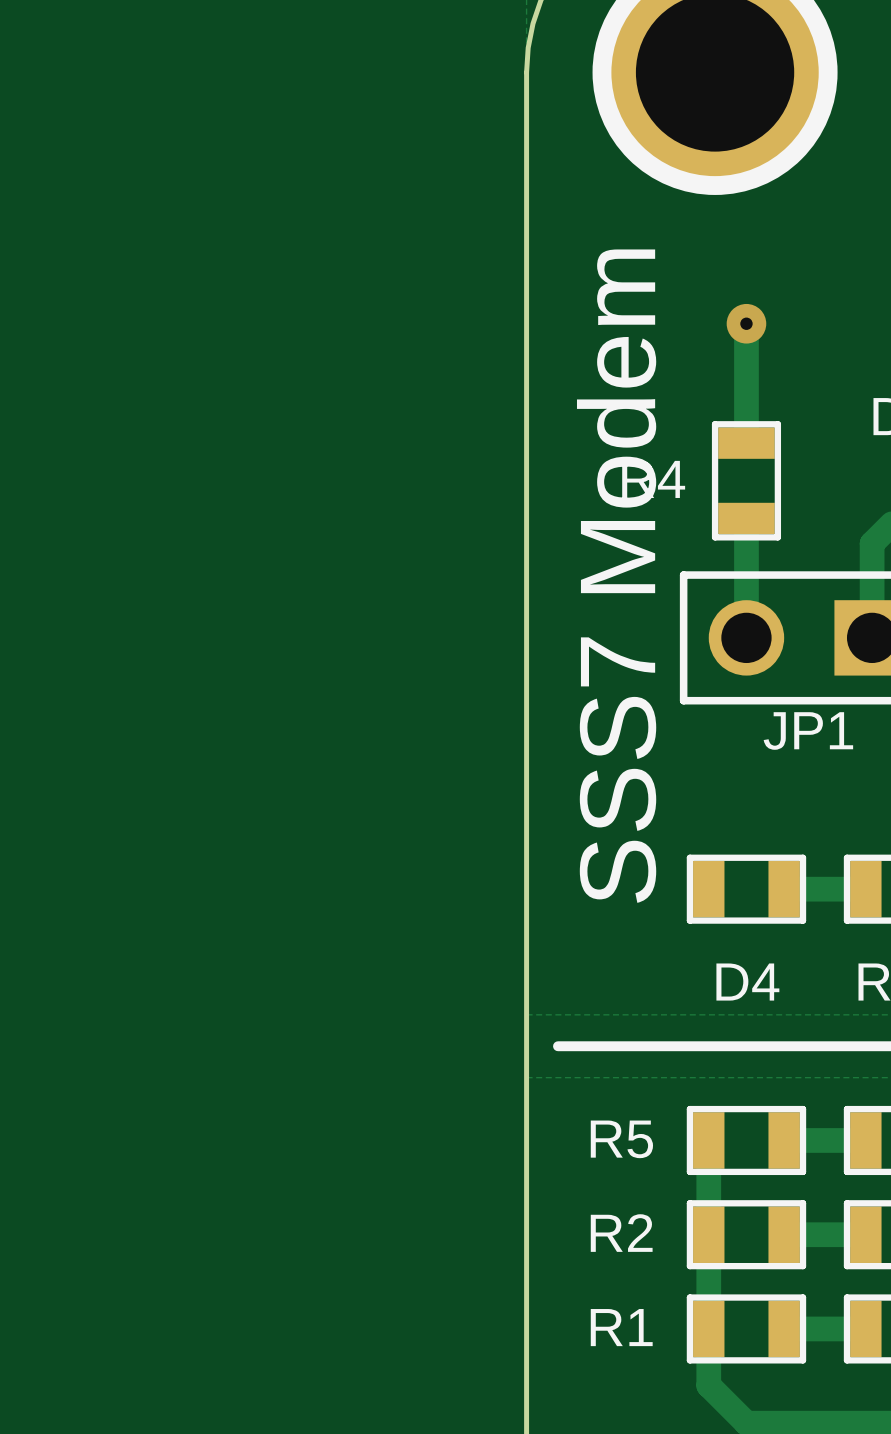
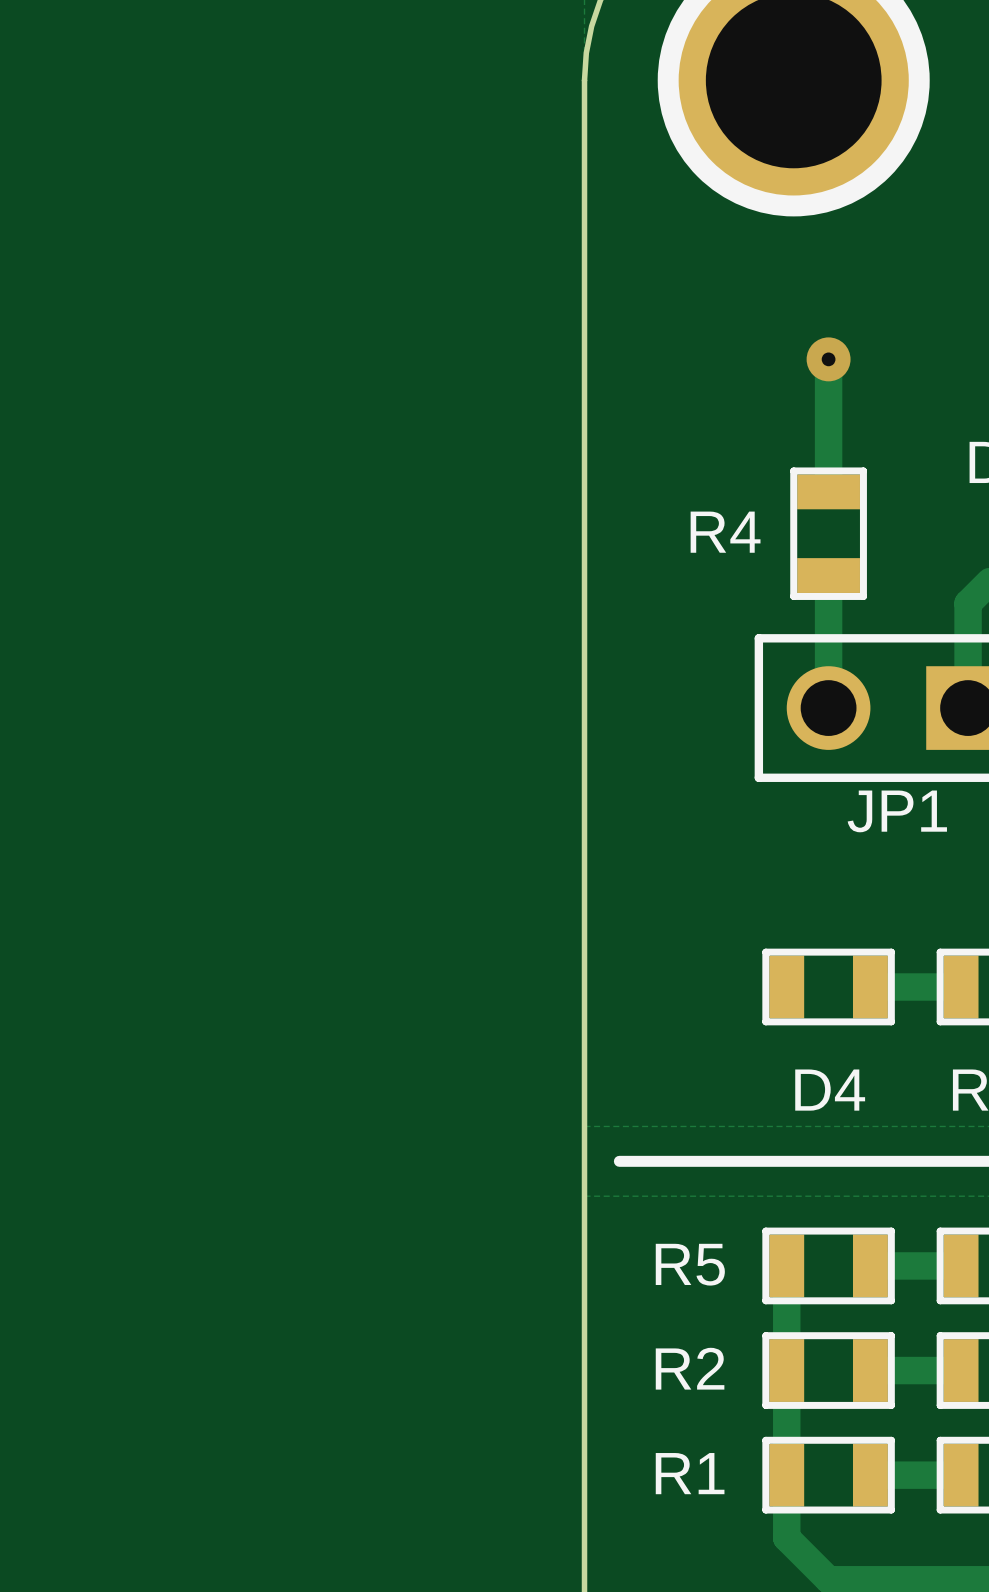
text: SSS7 Modem (616, 576) -> none

